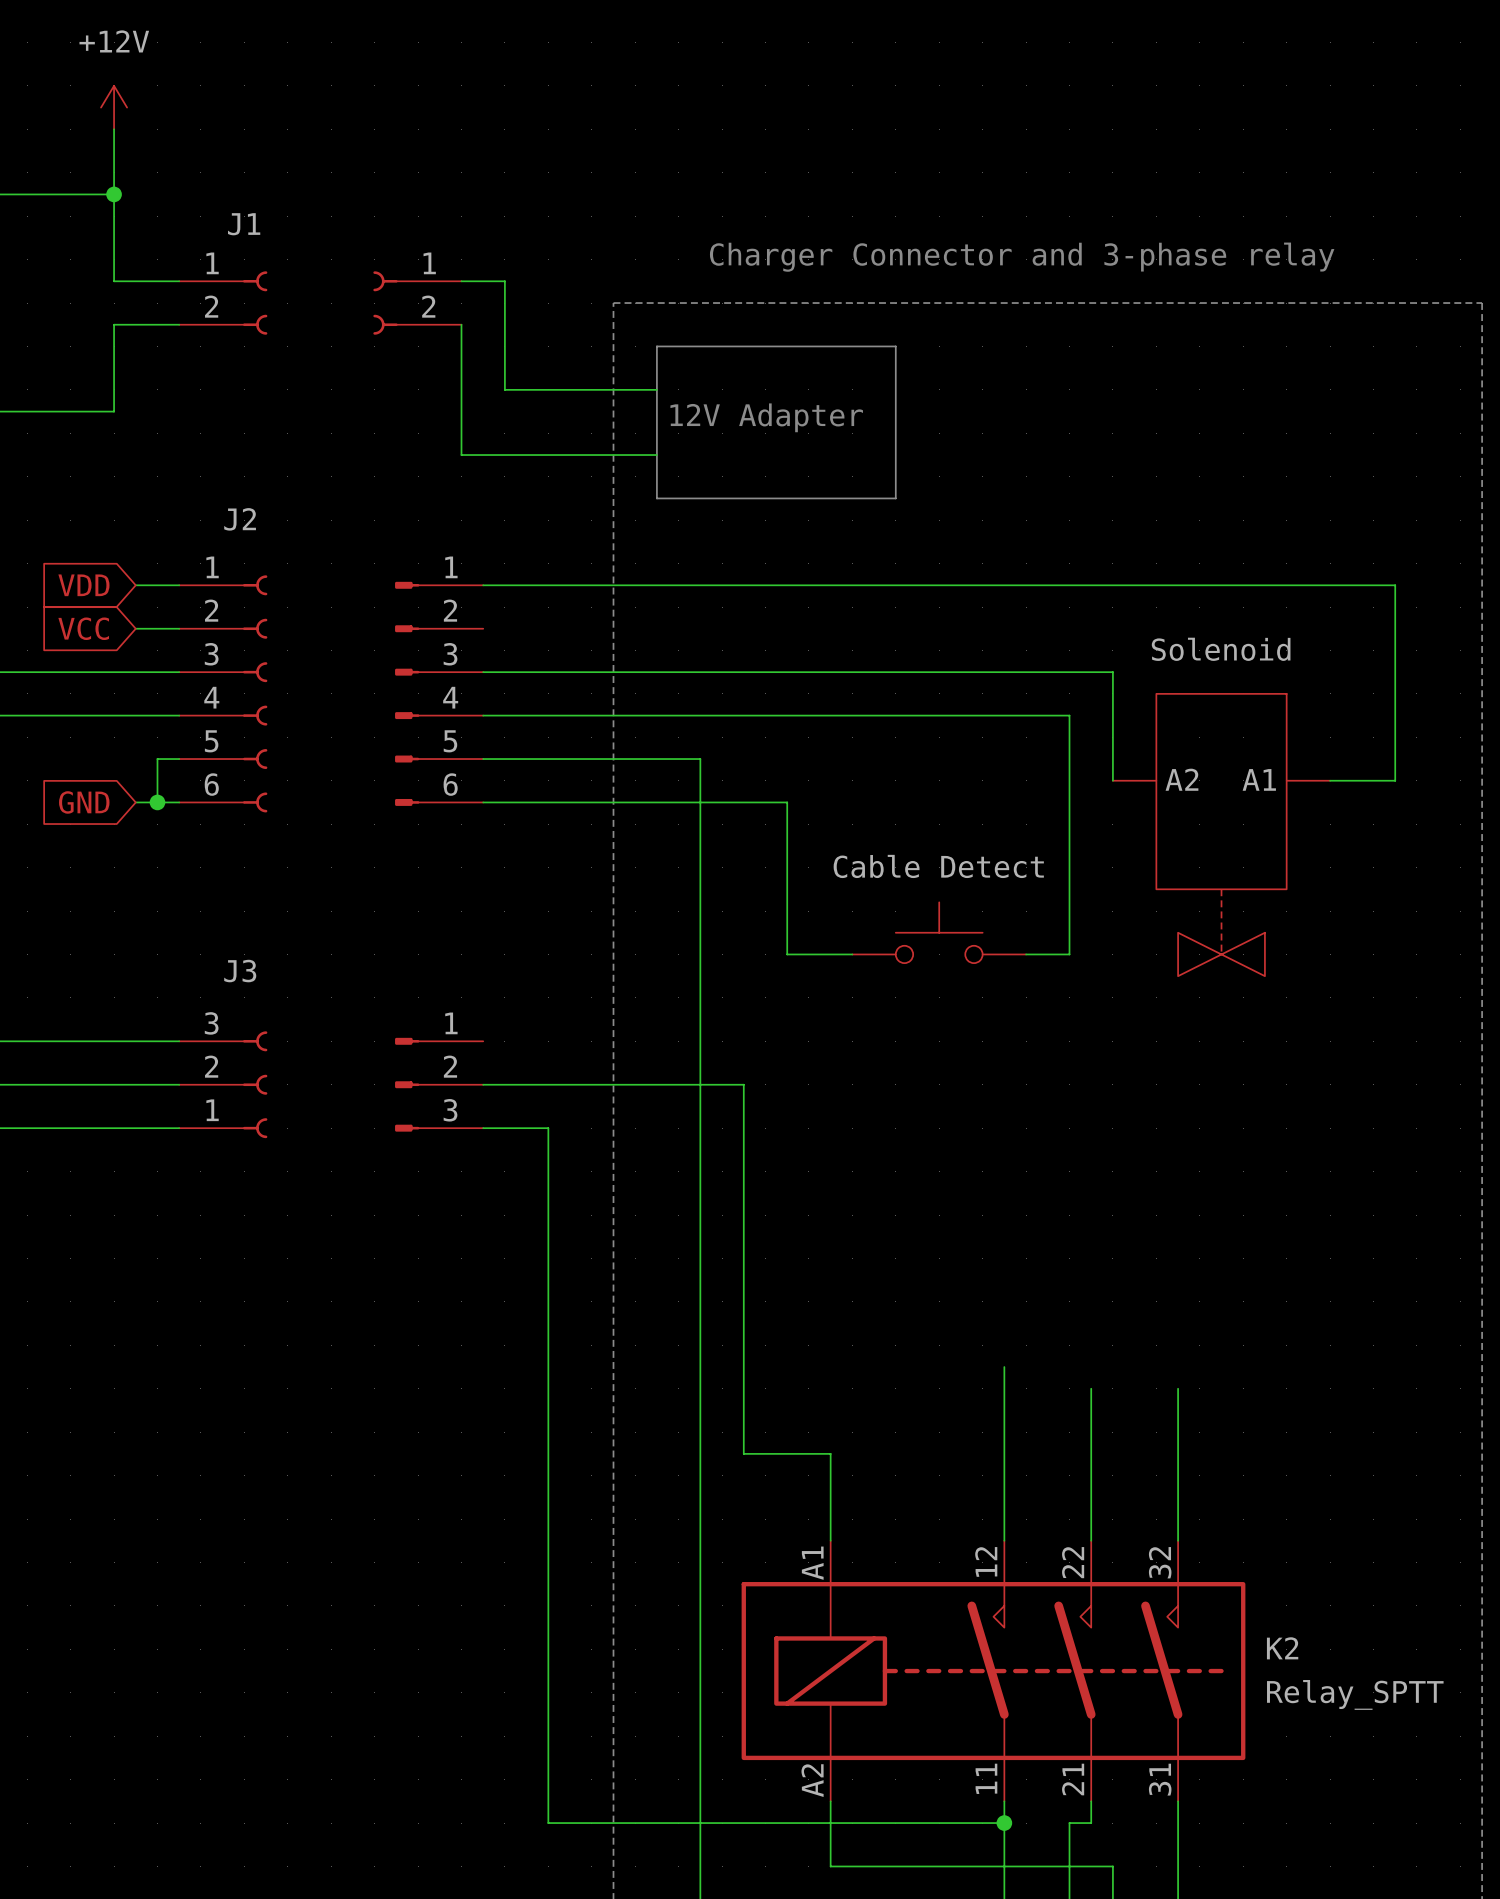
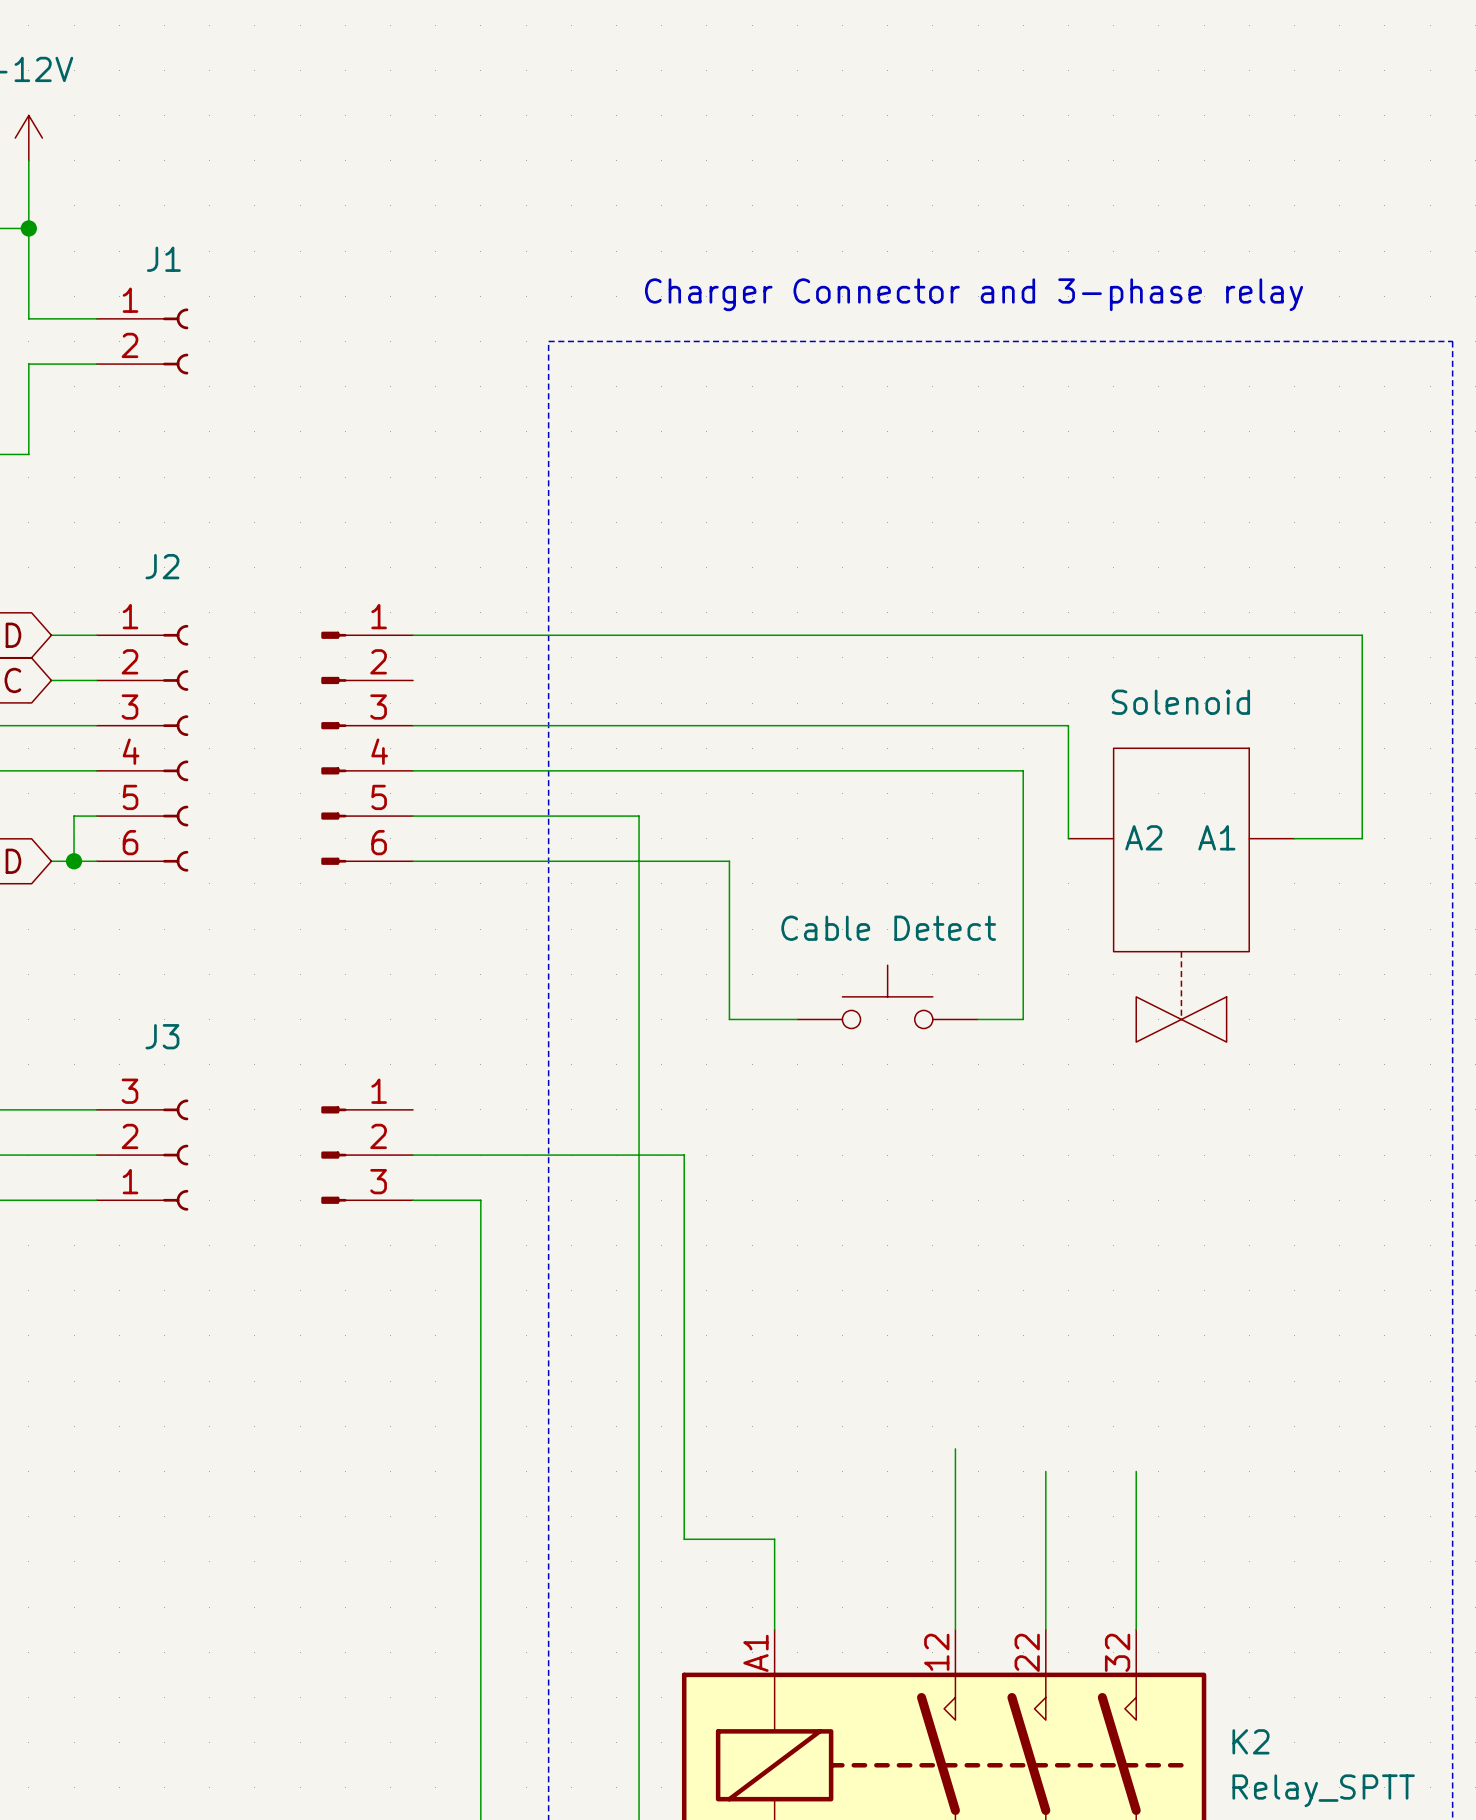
wire: (461, 281) (504, 281) (504, 389) (656, 389) -> none
part: (417, 303) -> none
wire: (461, 324) (461, 455) (656, 455) -> none
line: (656, 346) (895, 346) (895, 498) (656, 498) (656, 346) -> none
text: 12V Adapter (766, 417) -> none

